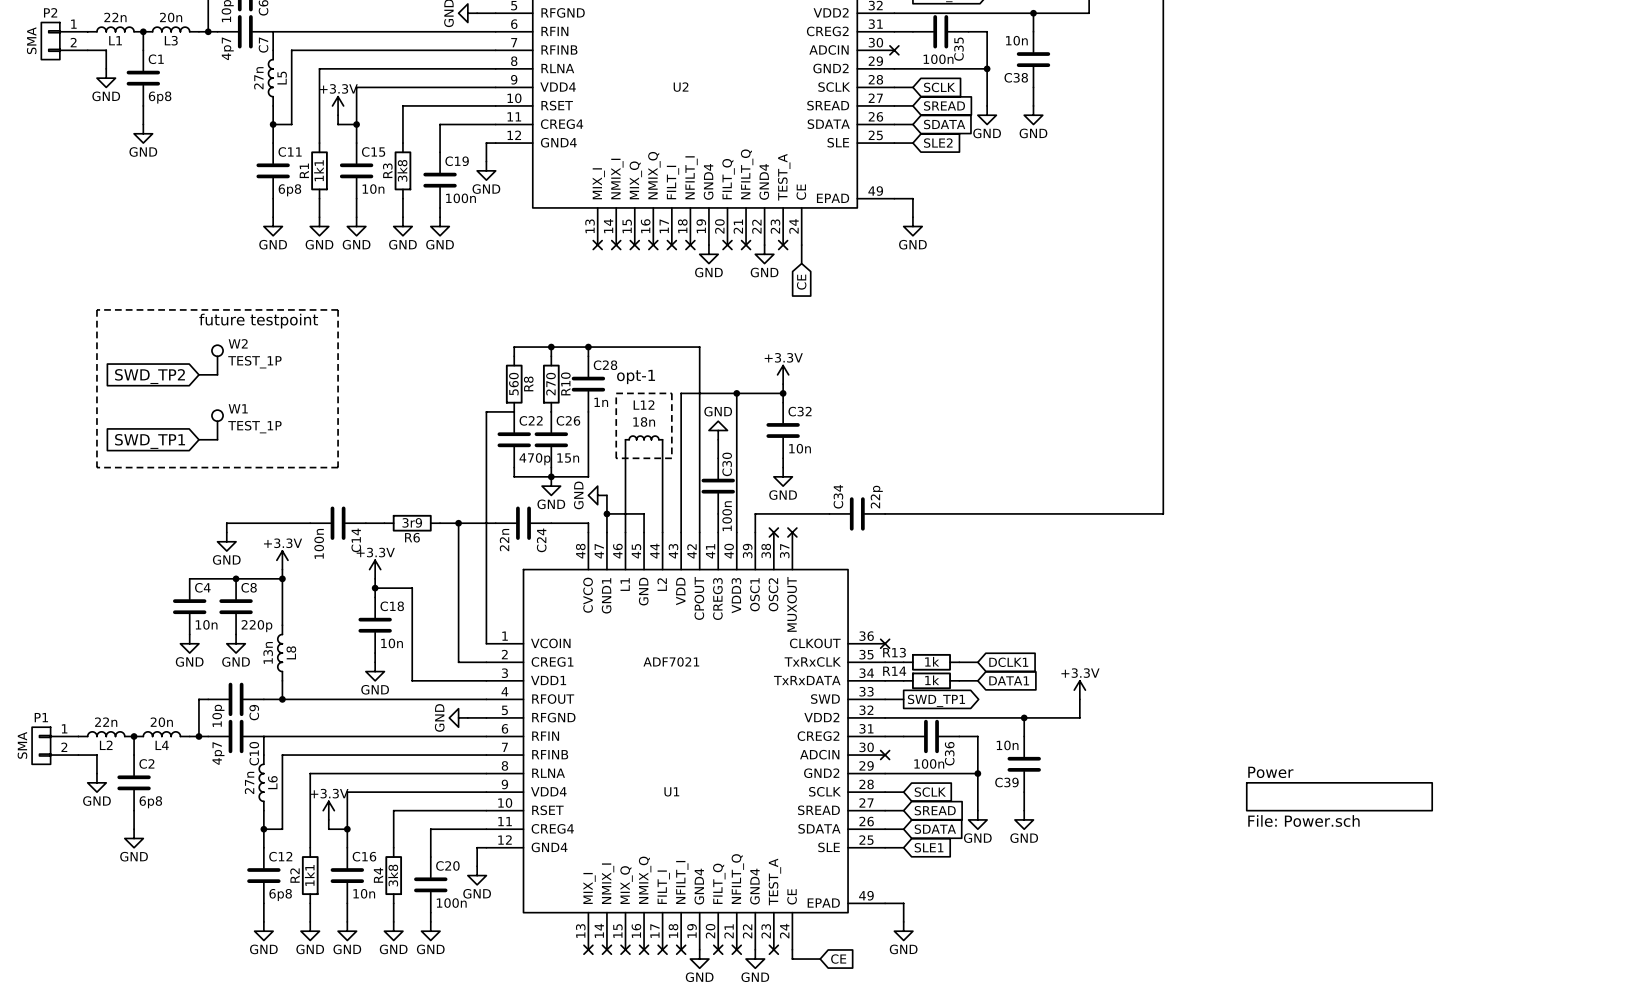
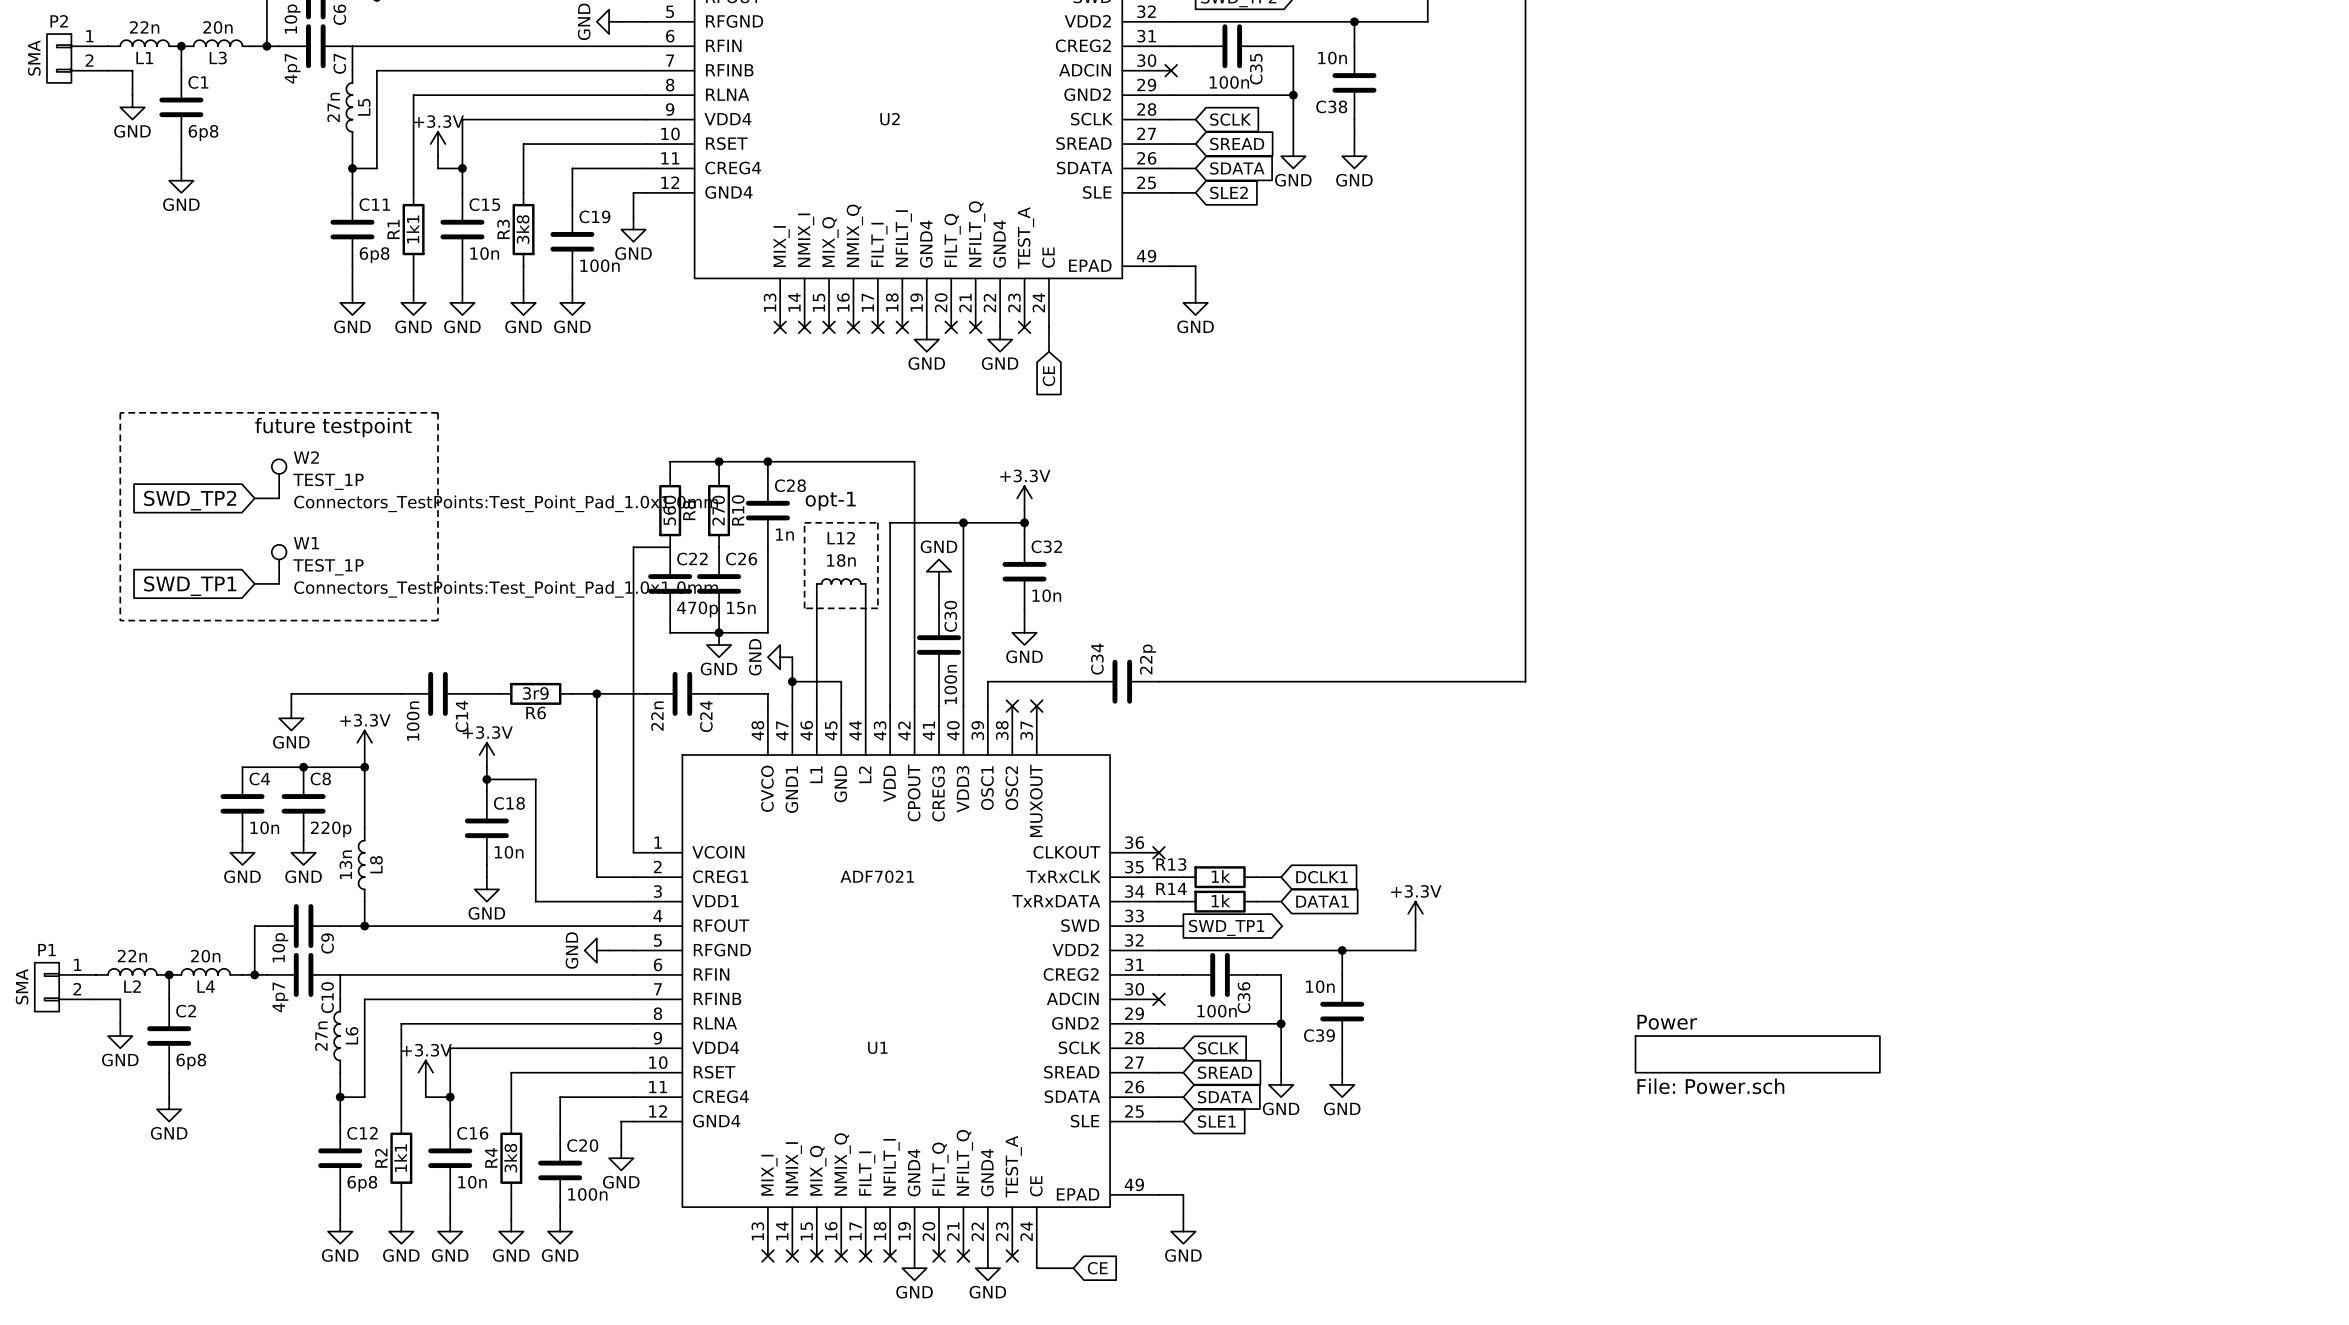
W2 text: none -> Connectors_TestPoints:Test_Point_Pad_1.0x1.0mm (506, 503)
W1 text: none -> Connectors_TestPoints:Test_Point_Pad_1.0x1.0mm (506, 589)

